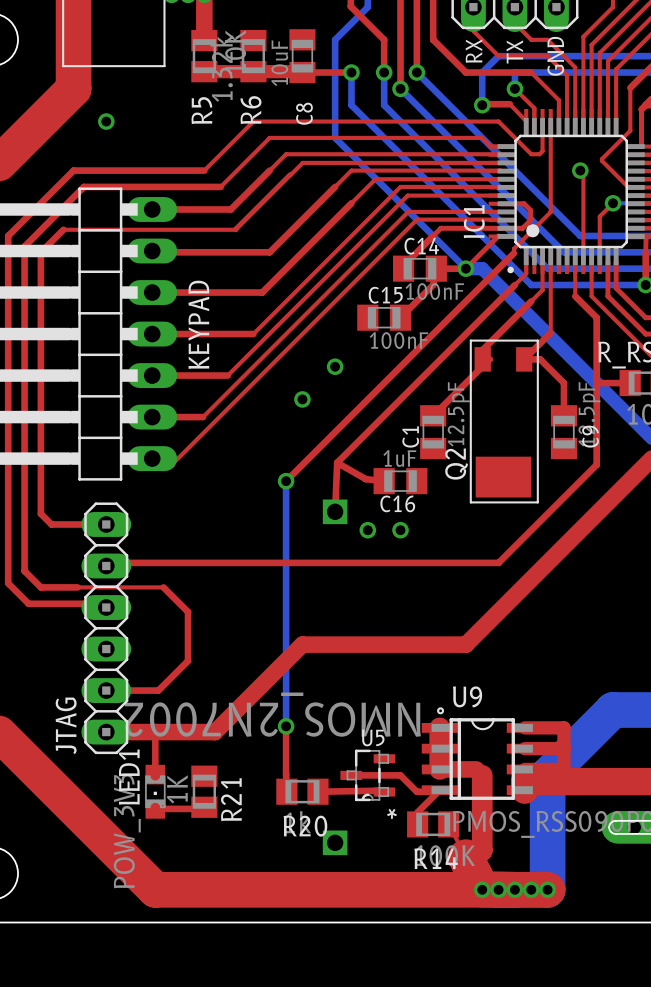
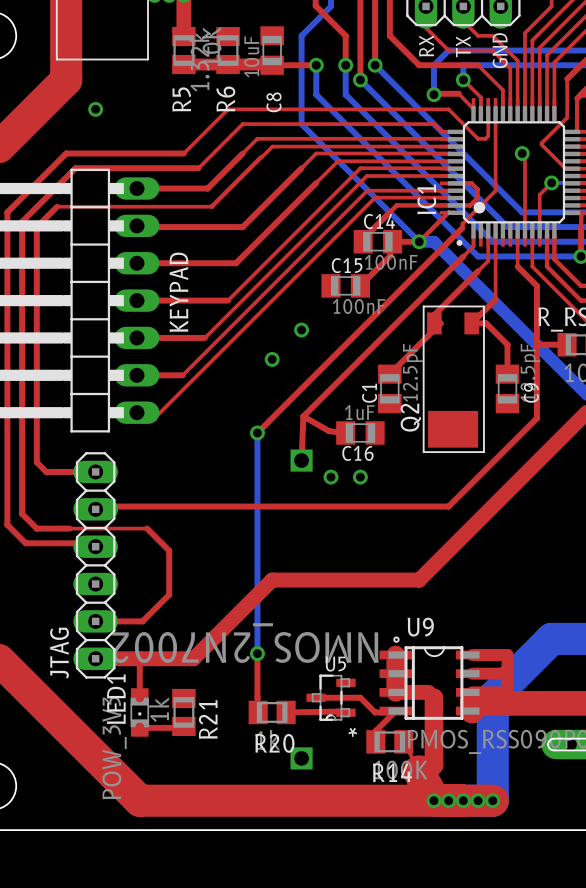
R21 value: 1K (177, 789) -> 1k (159, 709)

